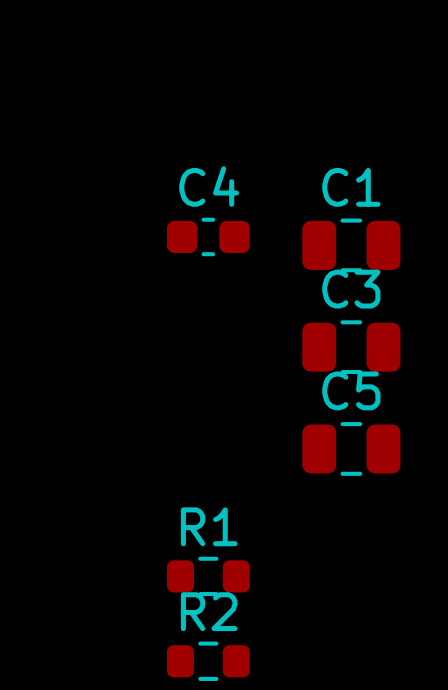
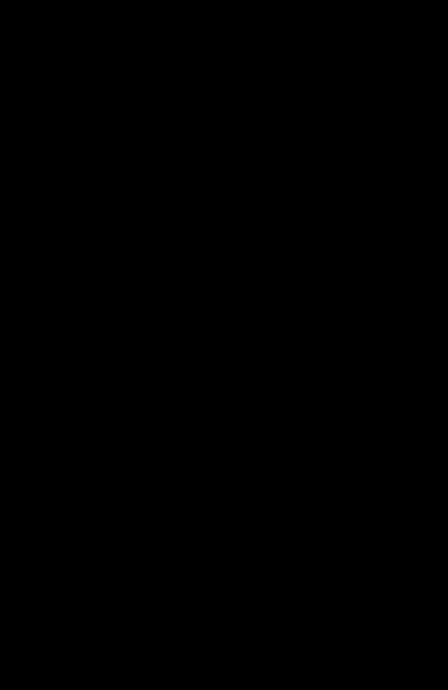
C4: (208, 236) -> none
C1: (351, 245) -> none
C3: (351, 347) -> none
C5: (351, 448) -> none
R1: (208, 576) -> none
R2: (208, 661) -> none

